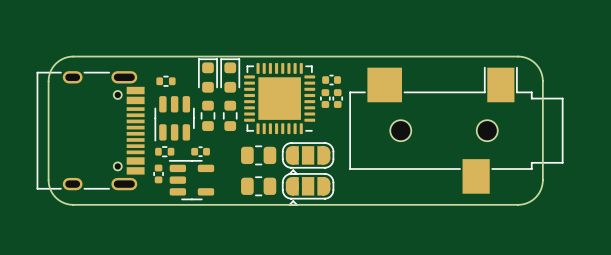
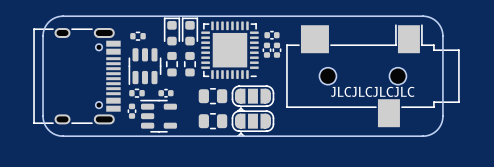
text: none -> JLCJLCJLCJLC (372, 91)

